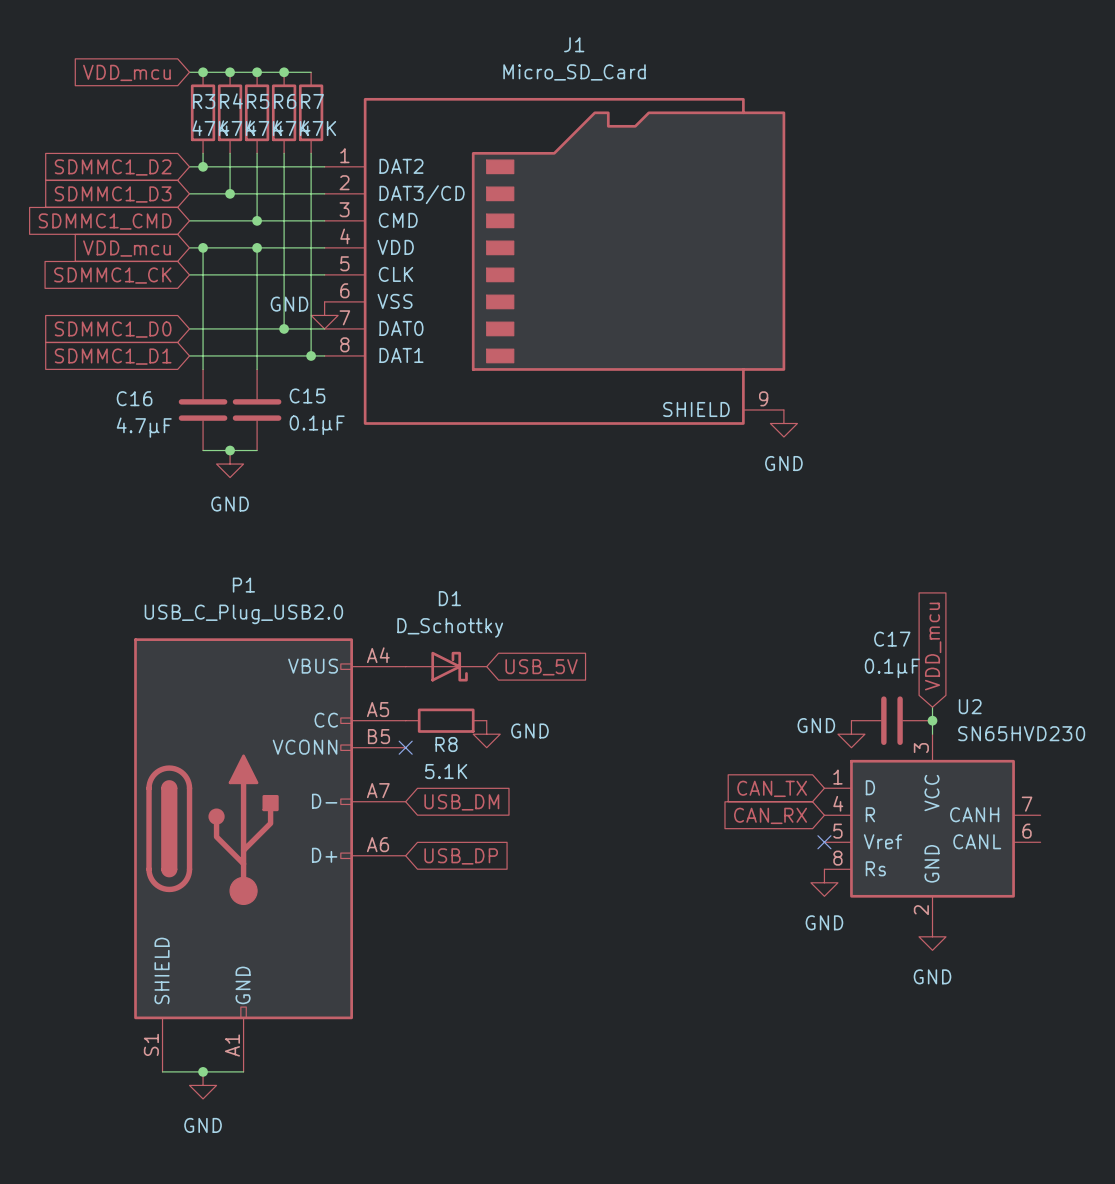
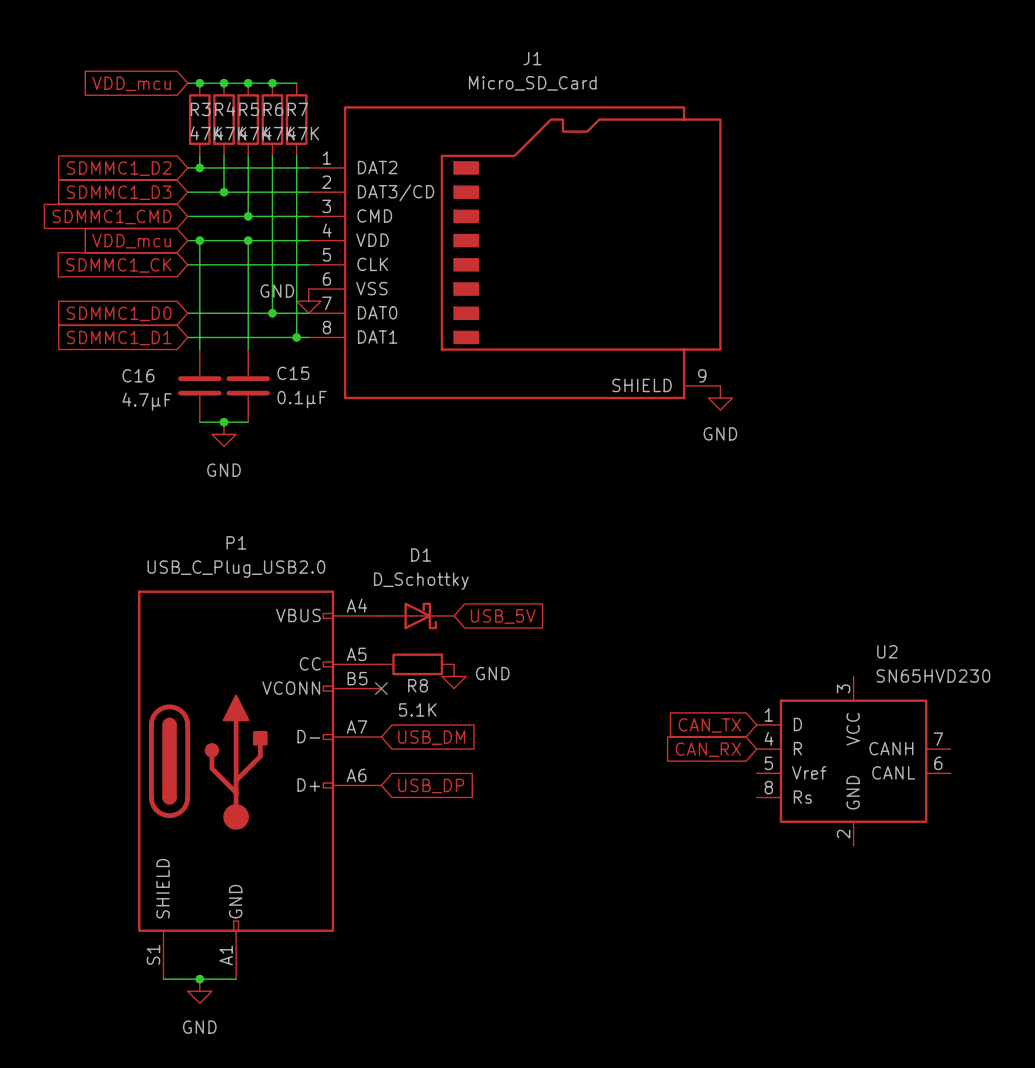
global label: VDD_mcu (933, 646) -> none
wire: (932, 707) (932, 734) -> none
C17: 0.1µF (891, 720) -> none
junction: (932, 720) -> none
power symbol: GND (851, 734) -> none
no-connect mark: (824, 842) -> none
power symbol: GND (824, 882) -> none
power symbol: GND (932, 936) -> none

